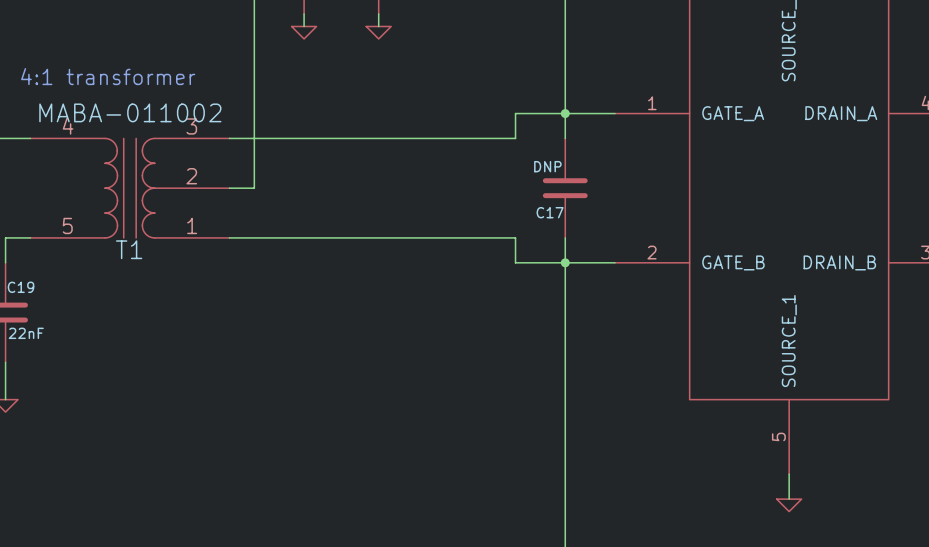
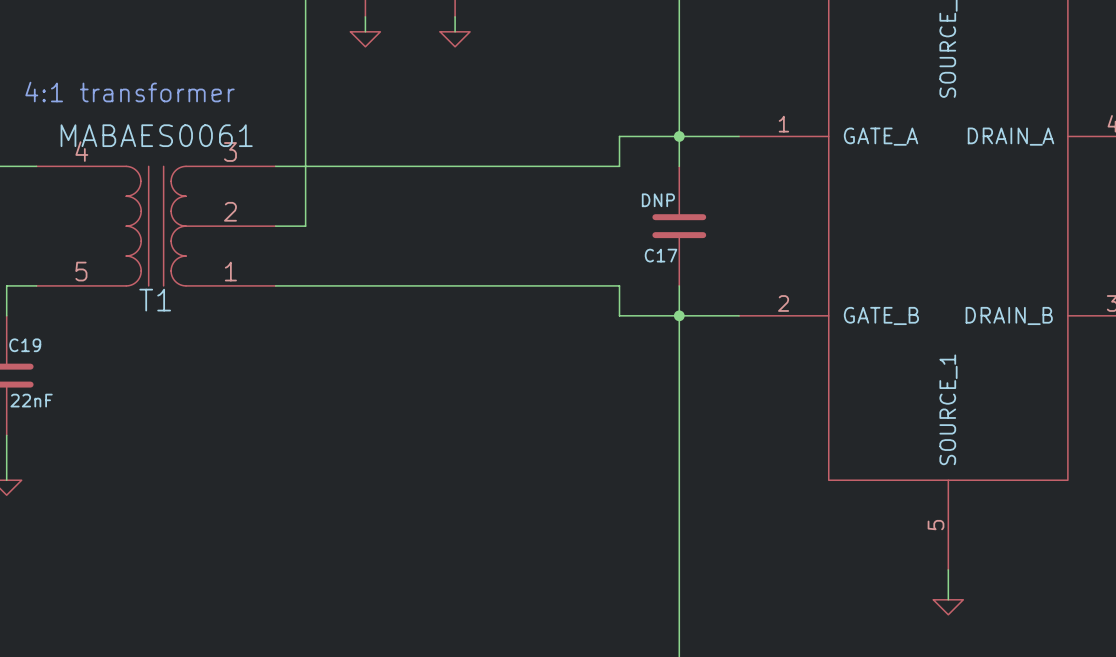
T1 value: MABA-011002 (130, 112) -> MABAES0061 (156, 135)

